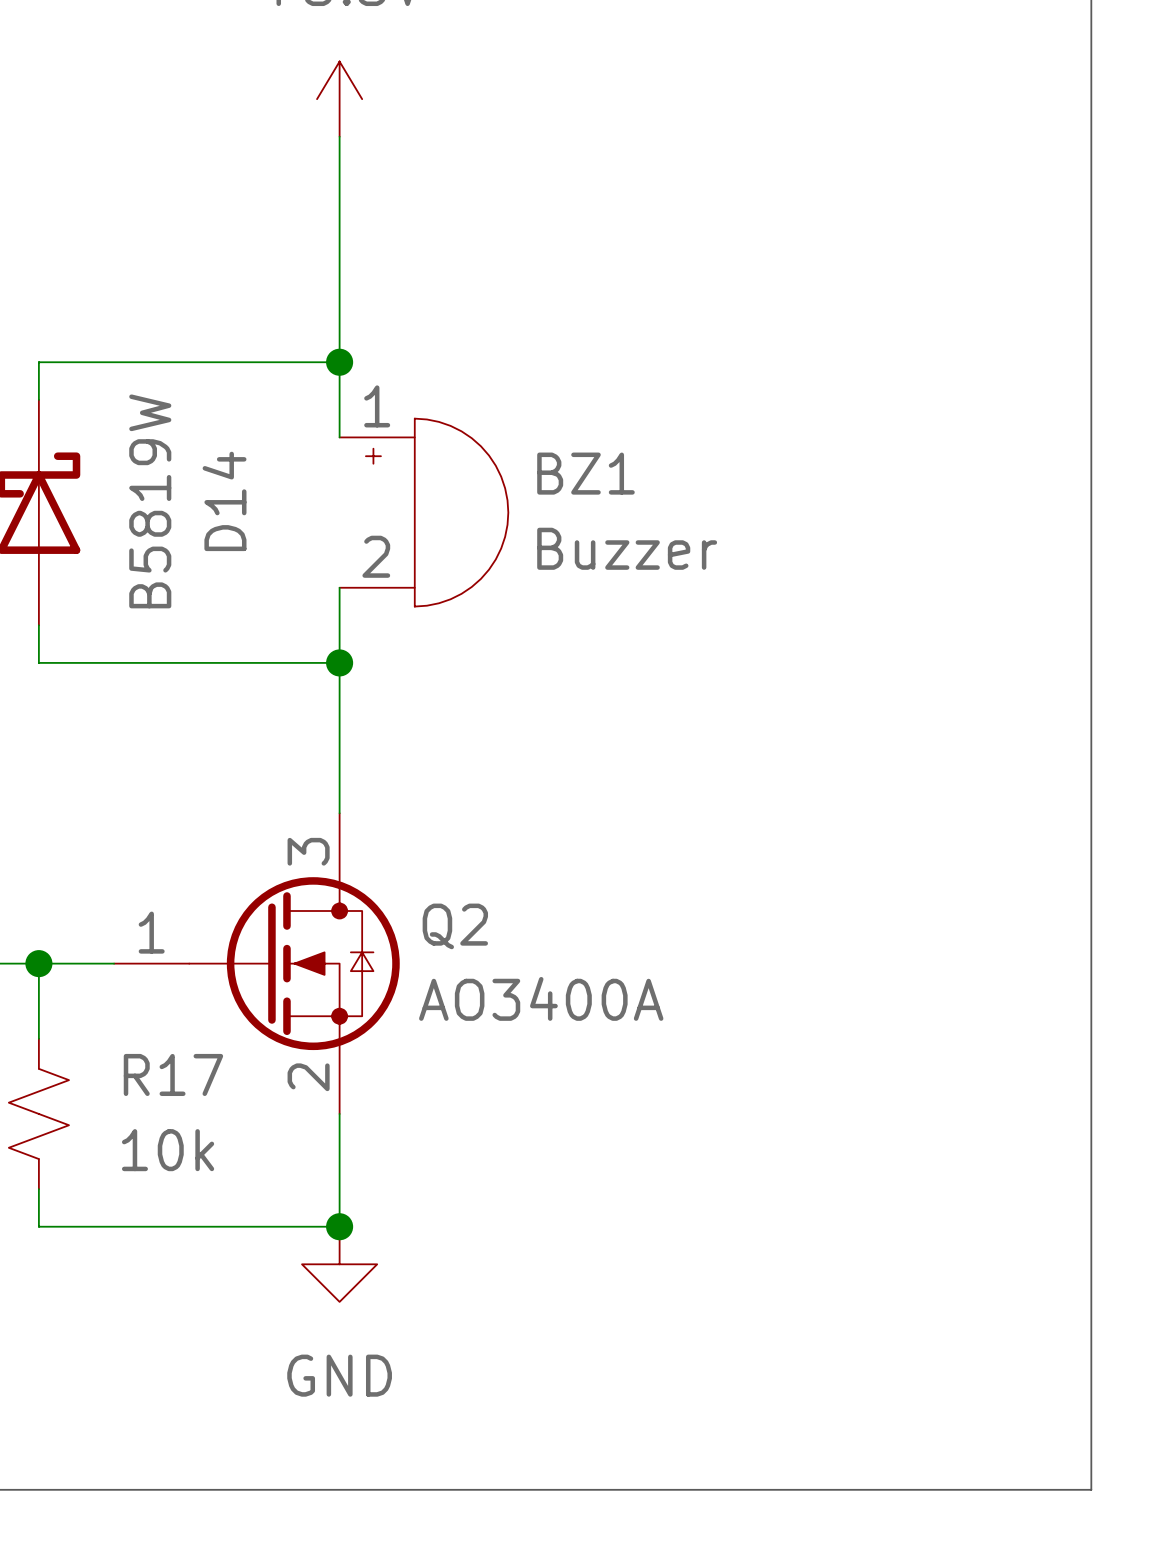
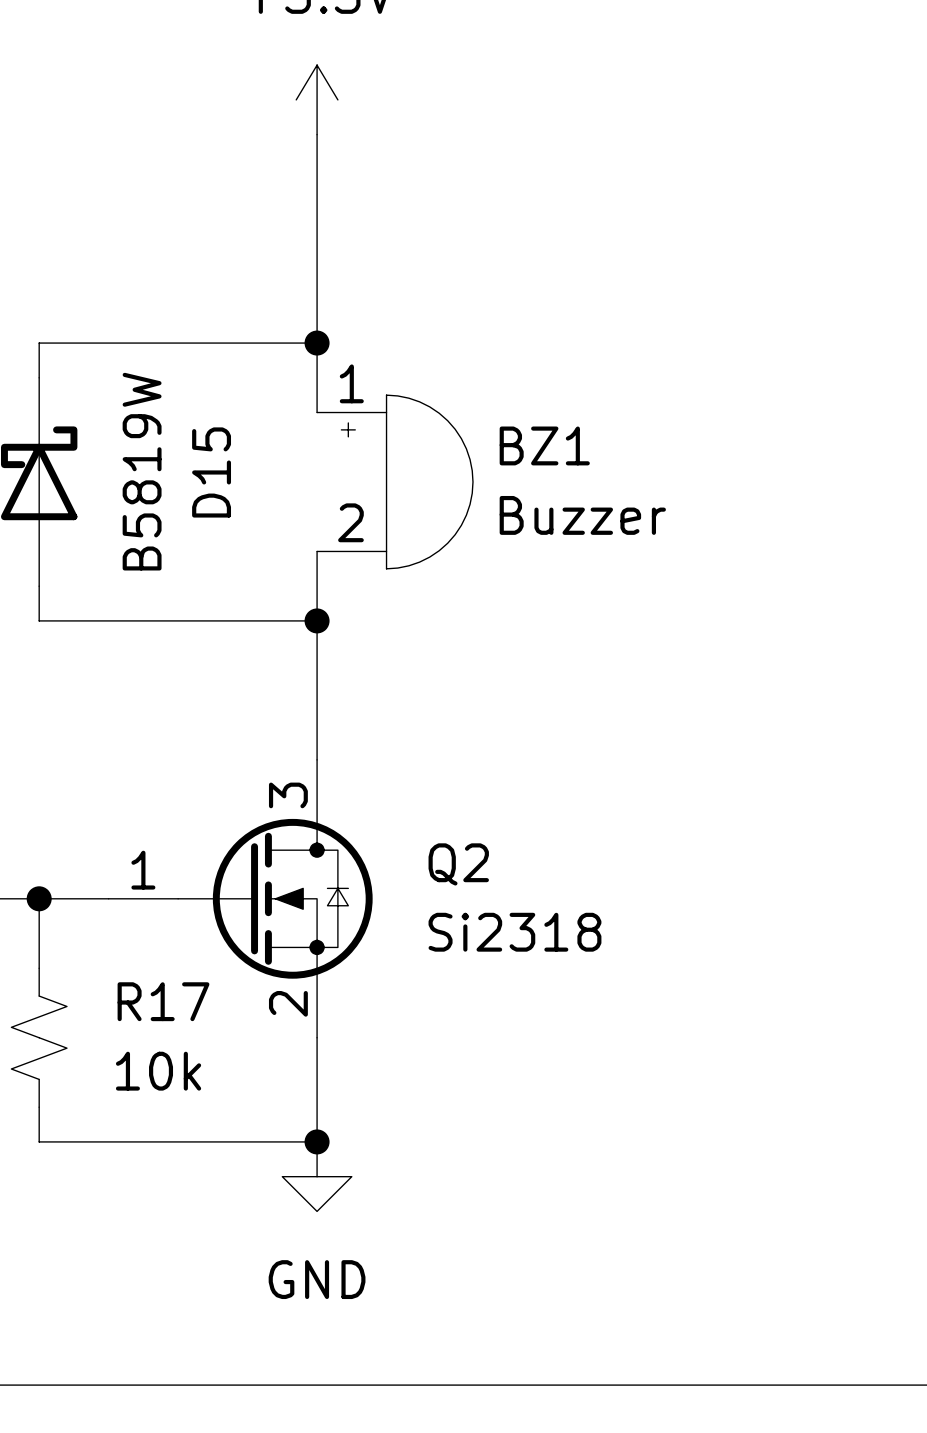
D14 name: D14 (224, 501) -> D15 (211, 472)
Q2 name position: Q2 (455, 926) -> Q2 (458, 864)
Q2 value: AO3400A (541, 998) -> Si2318 (514, 932)

